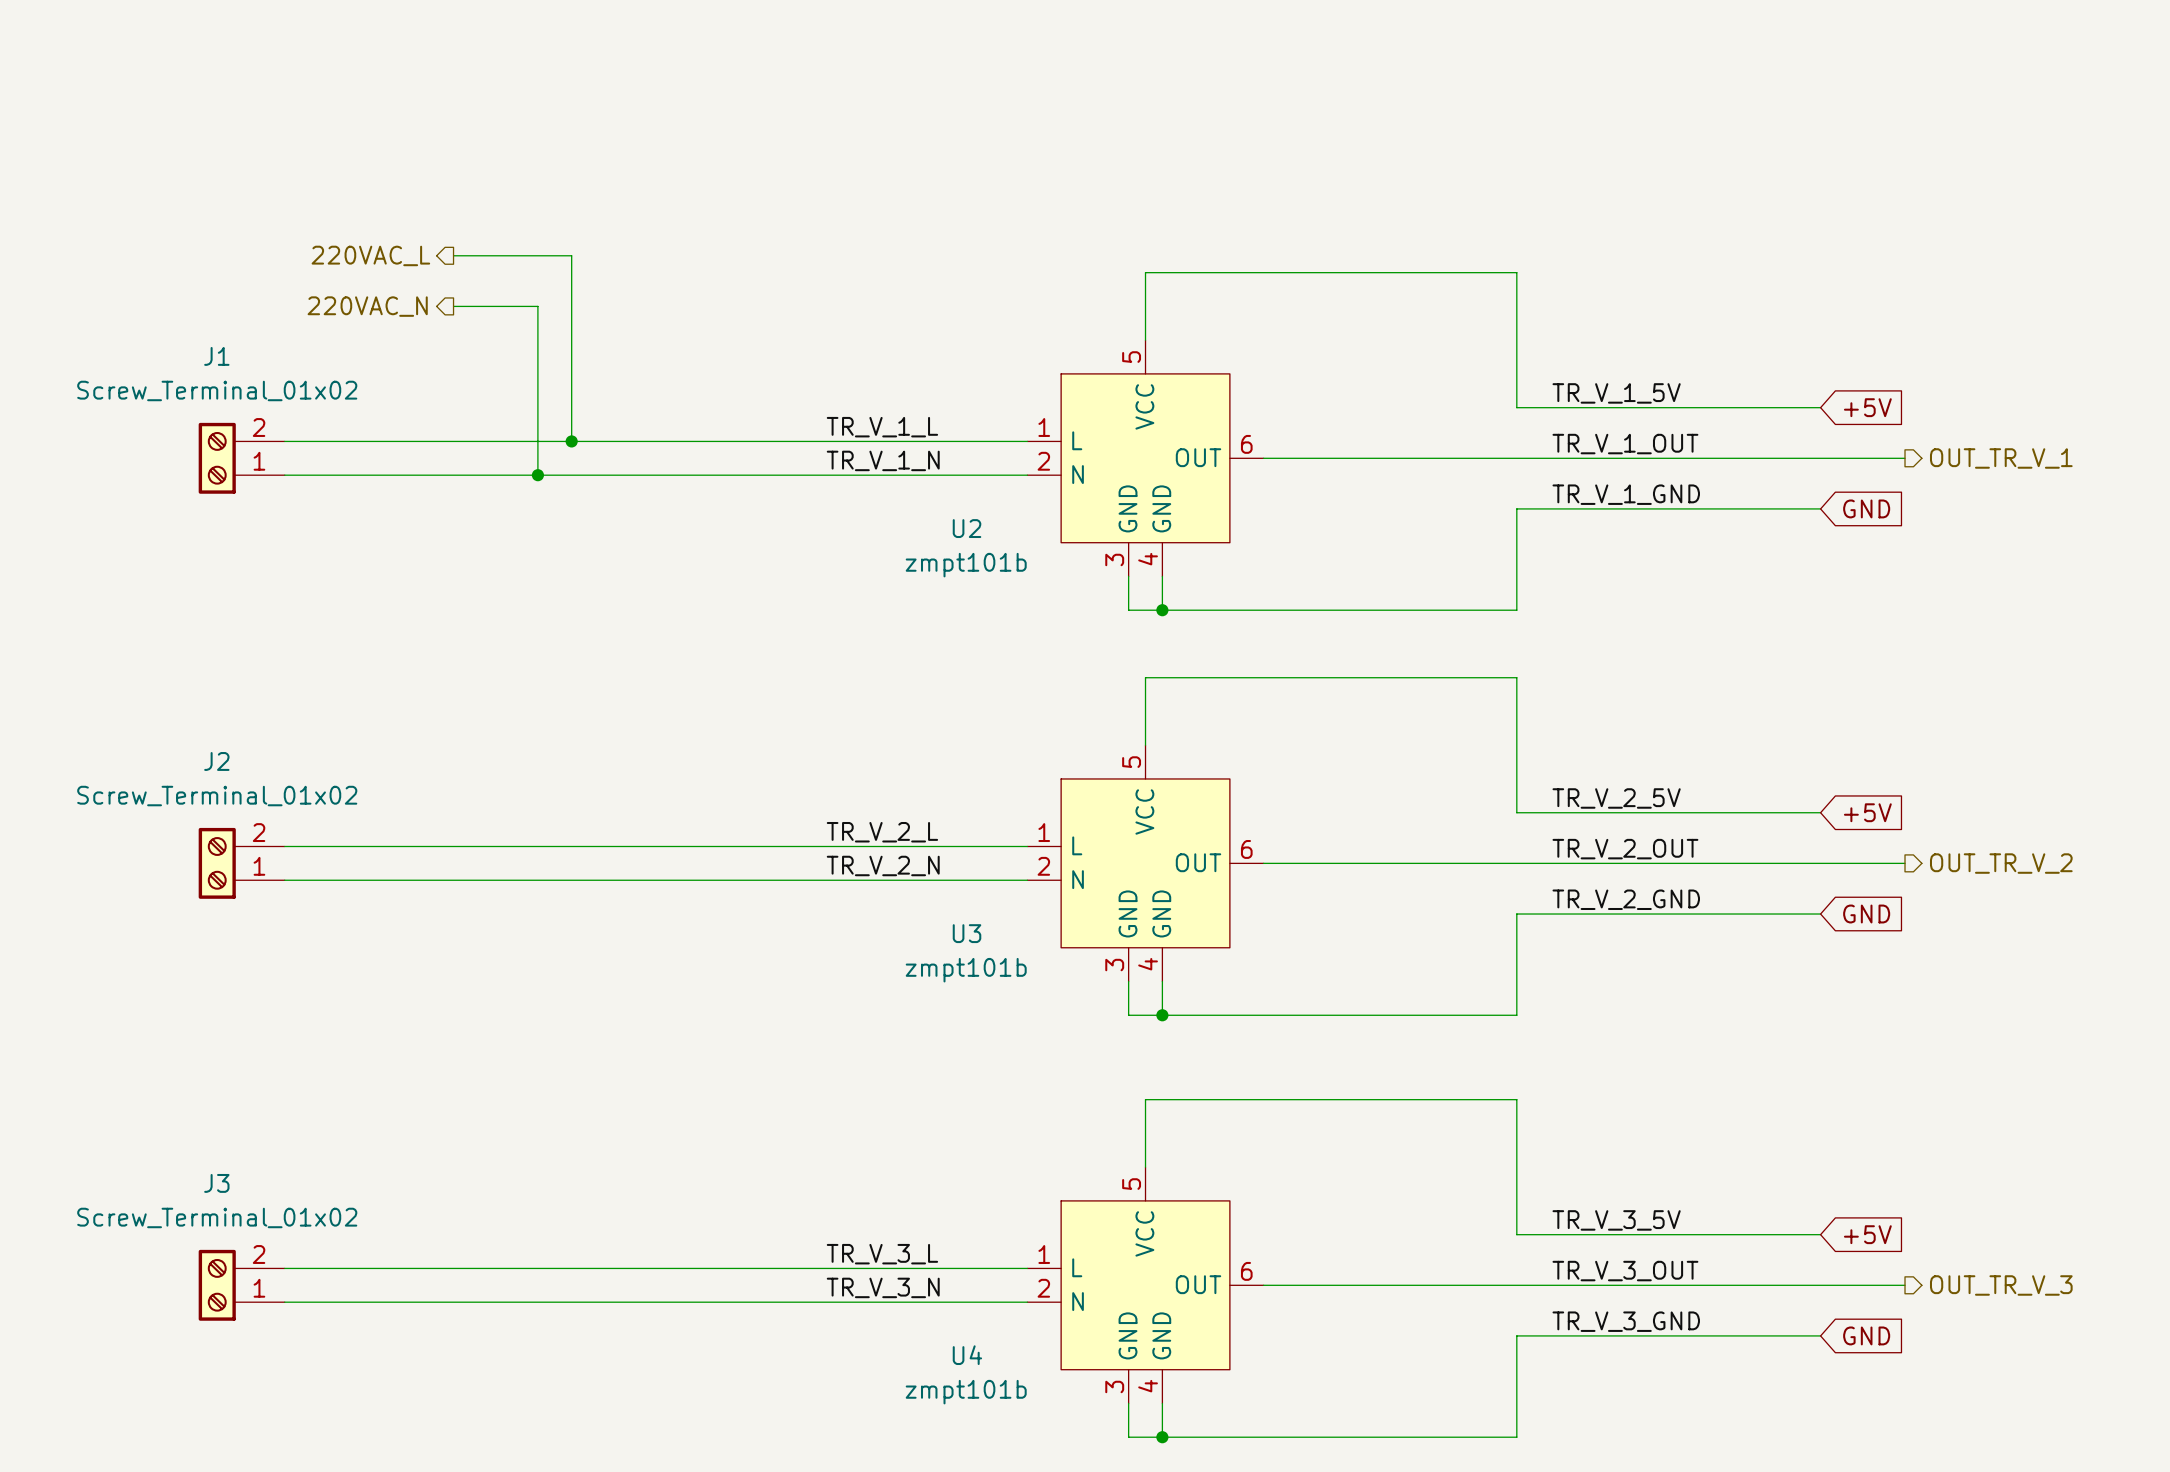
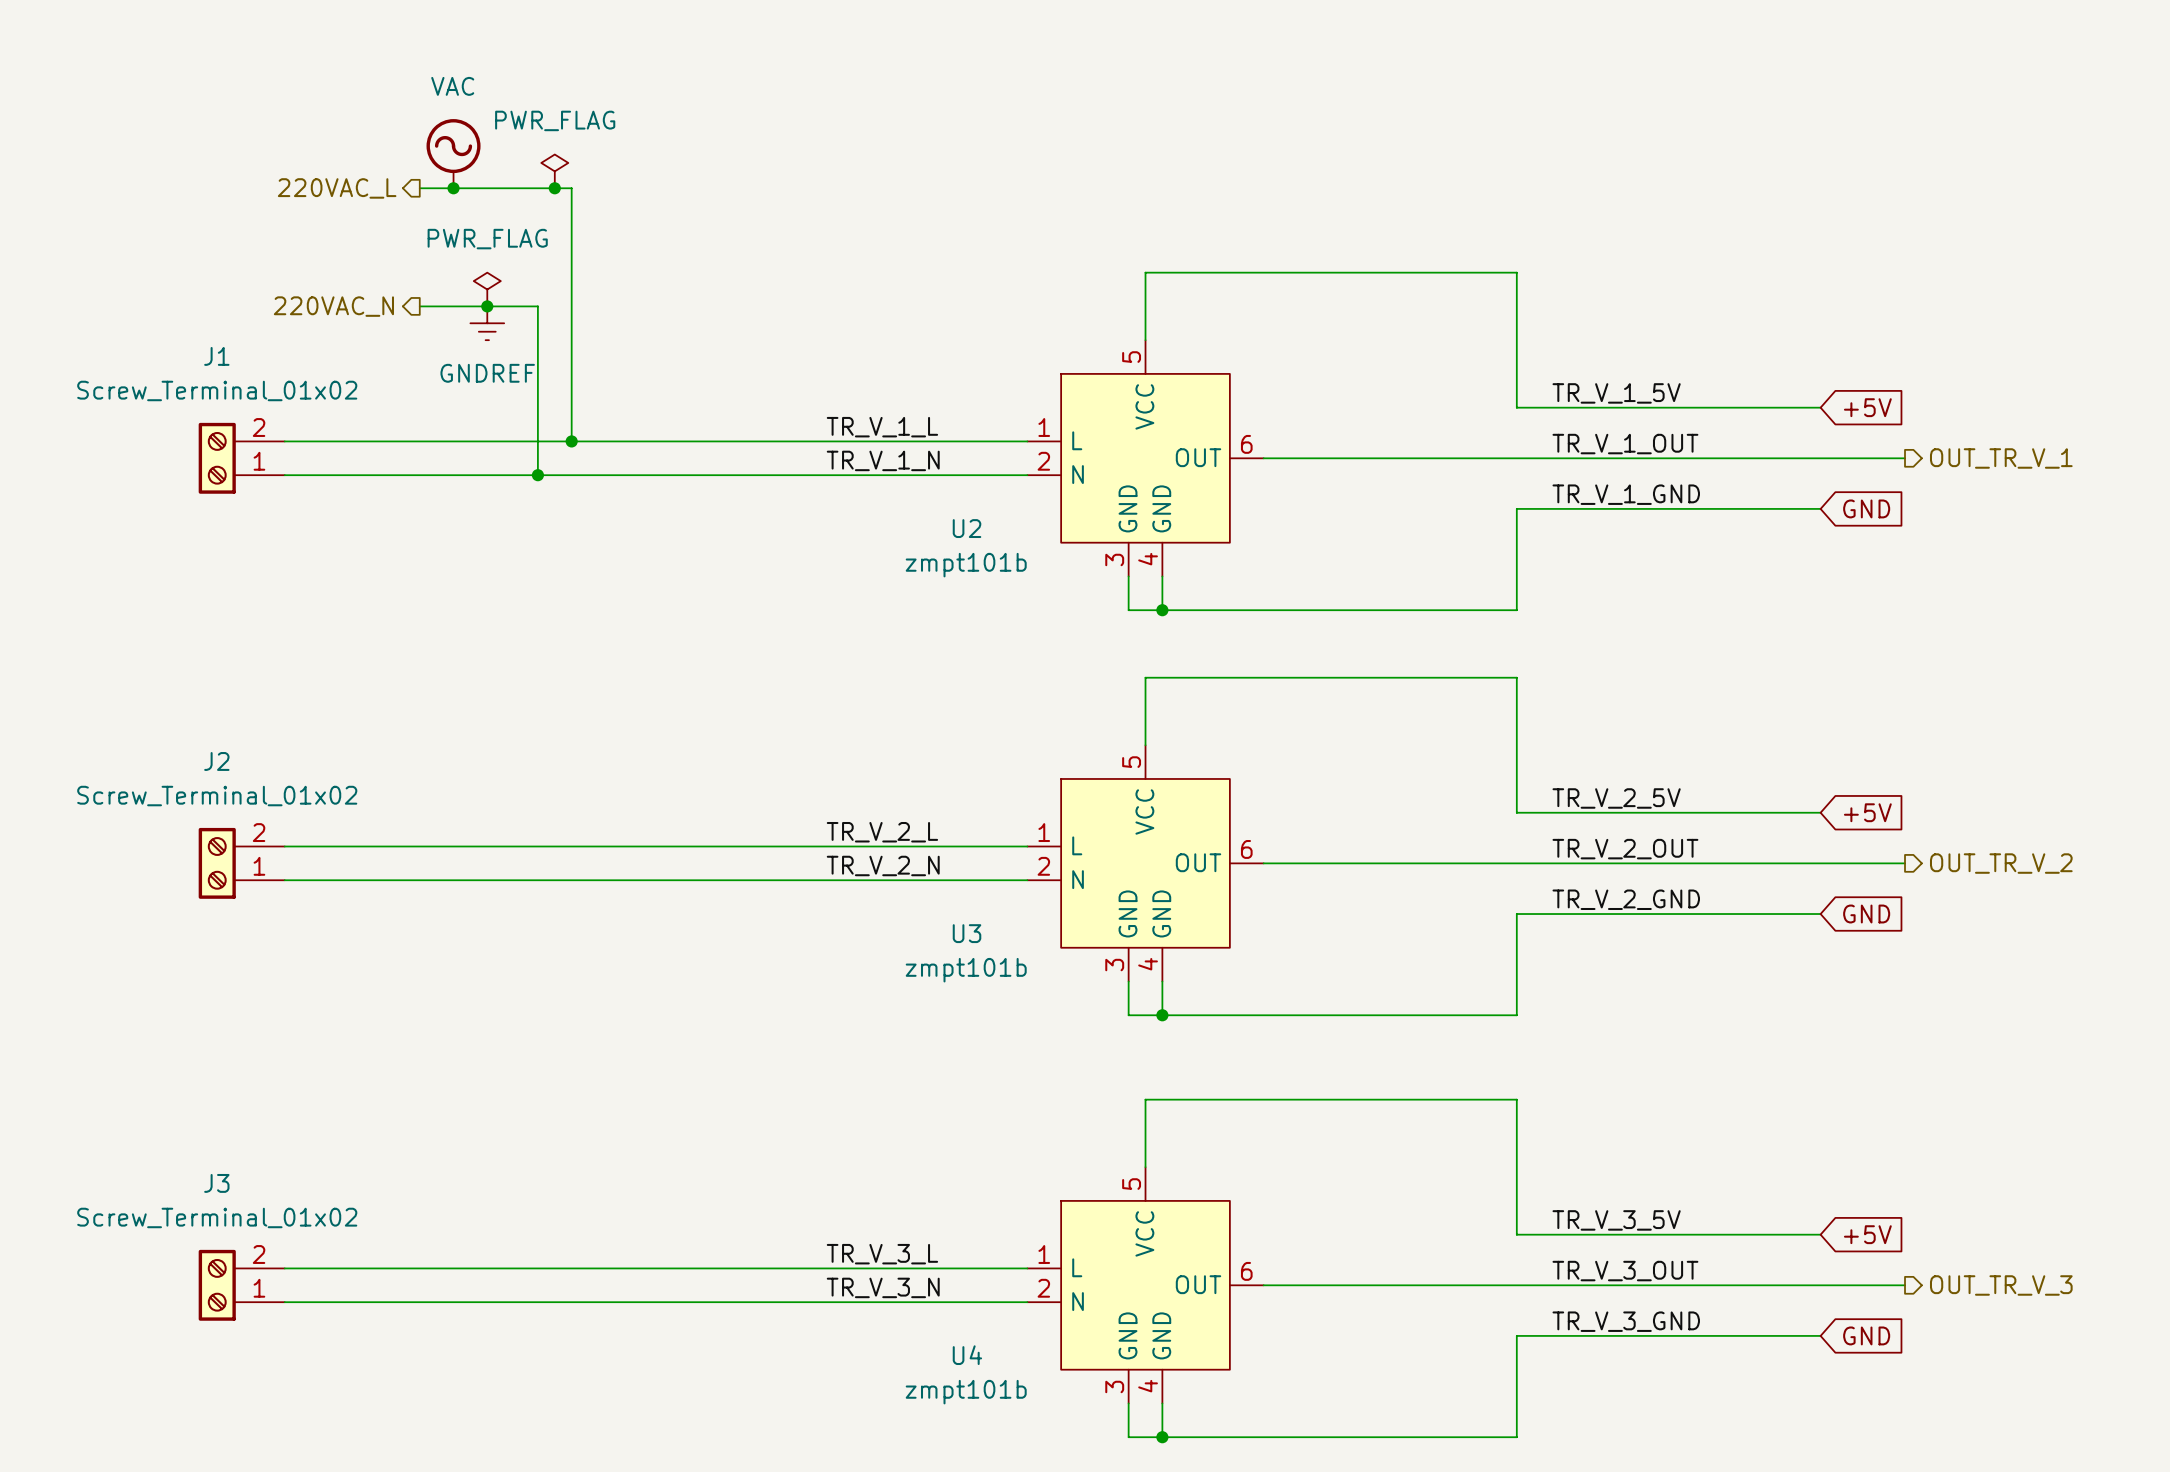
power symbol: none -> VAC (453, 153)
power symbol: none -> PWR_FLAG (554, 171)
junction: none -> (453, 188)
junction: none -> (554, 188)
hierarchical label position: 220VAC_L (370, 255) -> 220VAC_L (337, 188)
wire: (453, 255) (571, 255) -> (419, 188) (571, 188) (571, 255)
power symbol: none -> PWR_FLAG (487, 289)
hierarchical label position: 220VAC_N (367, 306) -> 220VAC_N (333, 306)
wire: none -> (419, 306) (453, 306)
junction: none -> (487, 306)
power symbol: none -> GNDREF (487, 323)

